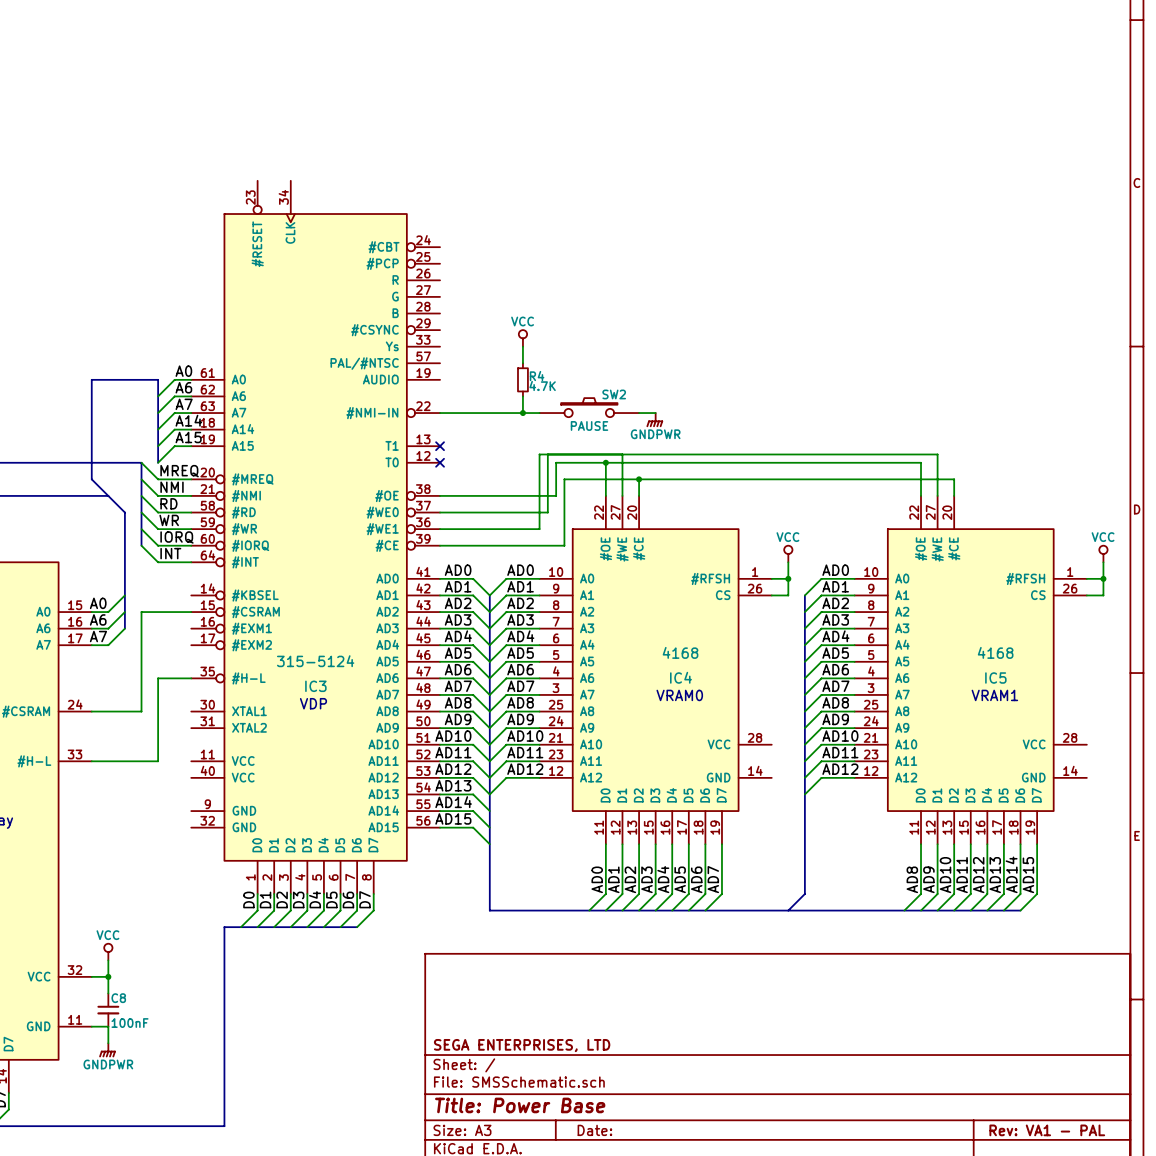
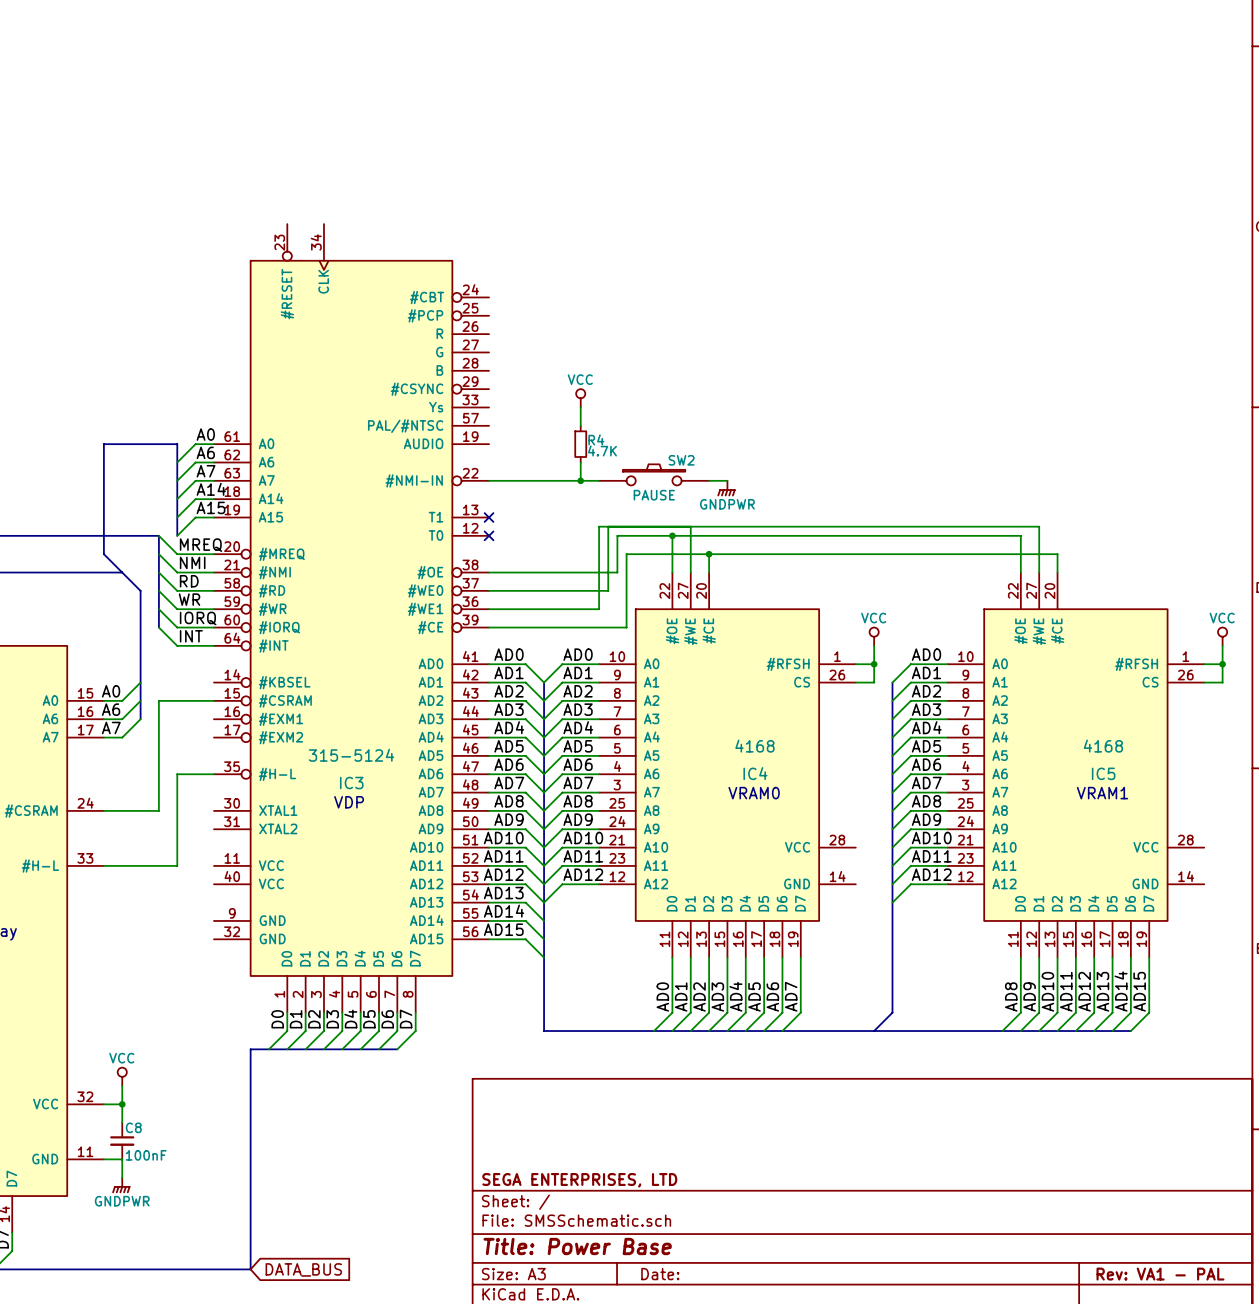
global label: none -> DATA_BUS (303, 1269)

